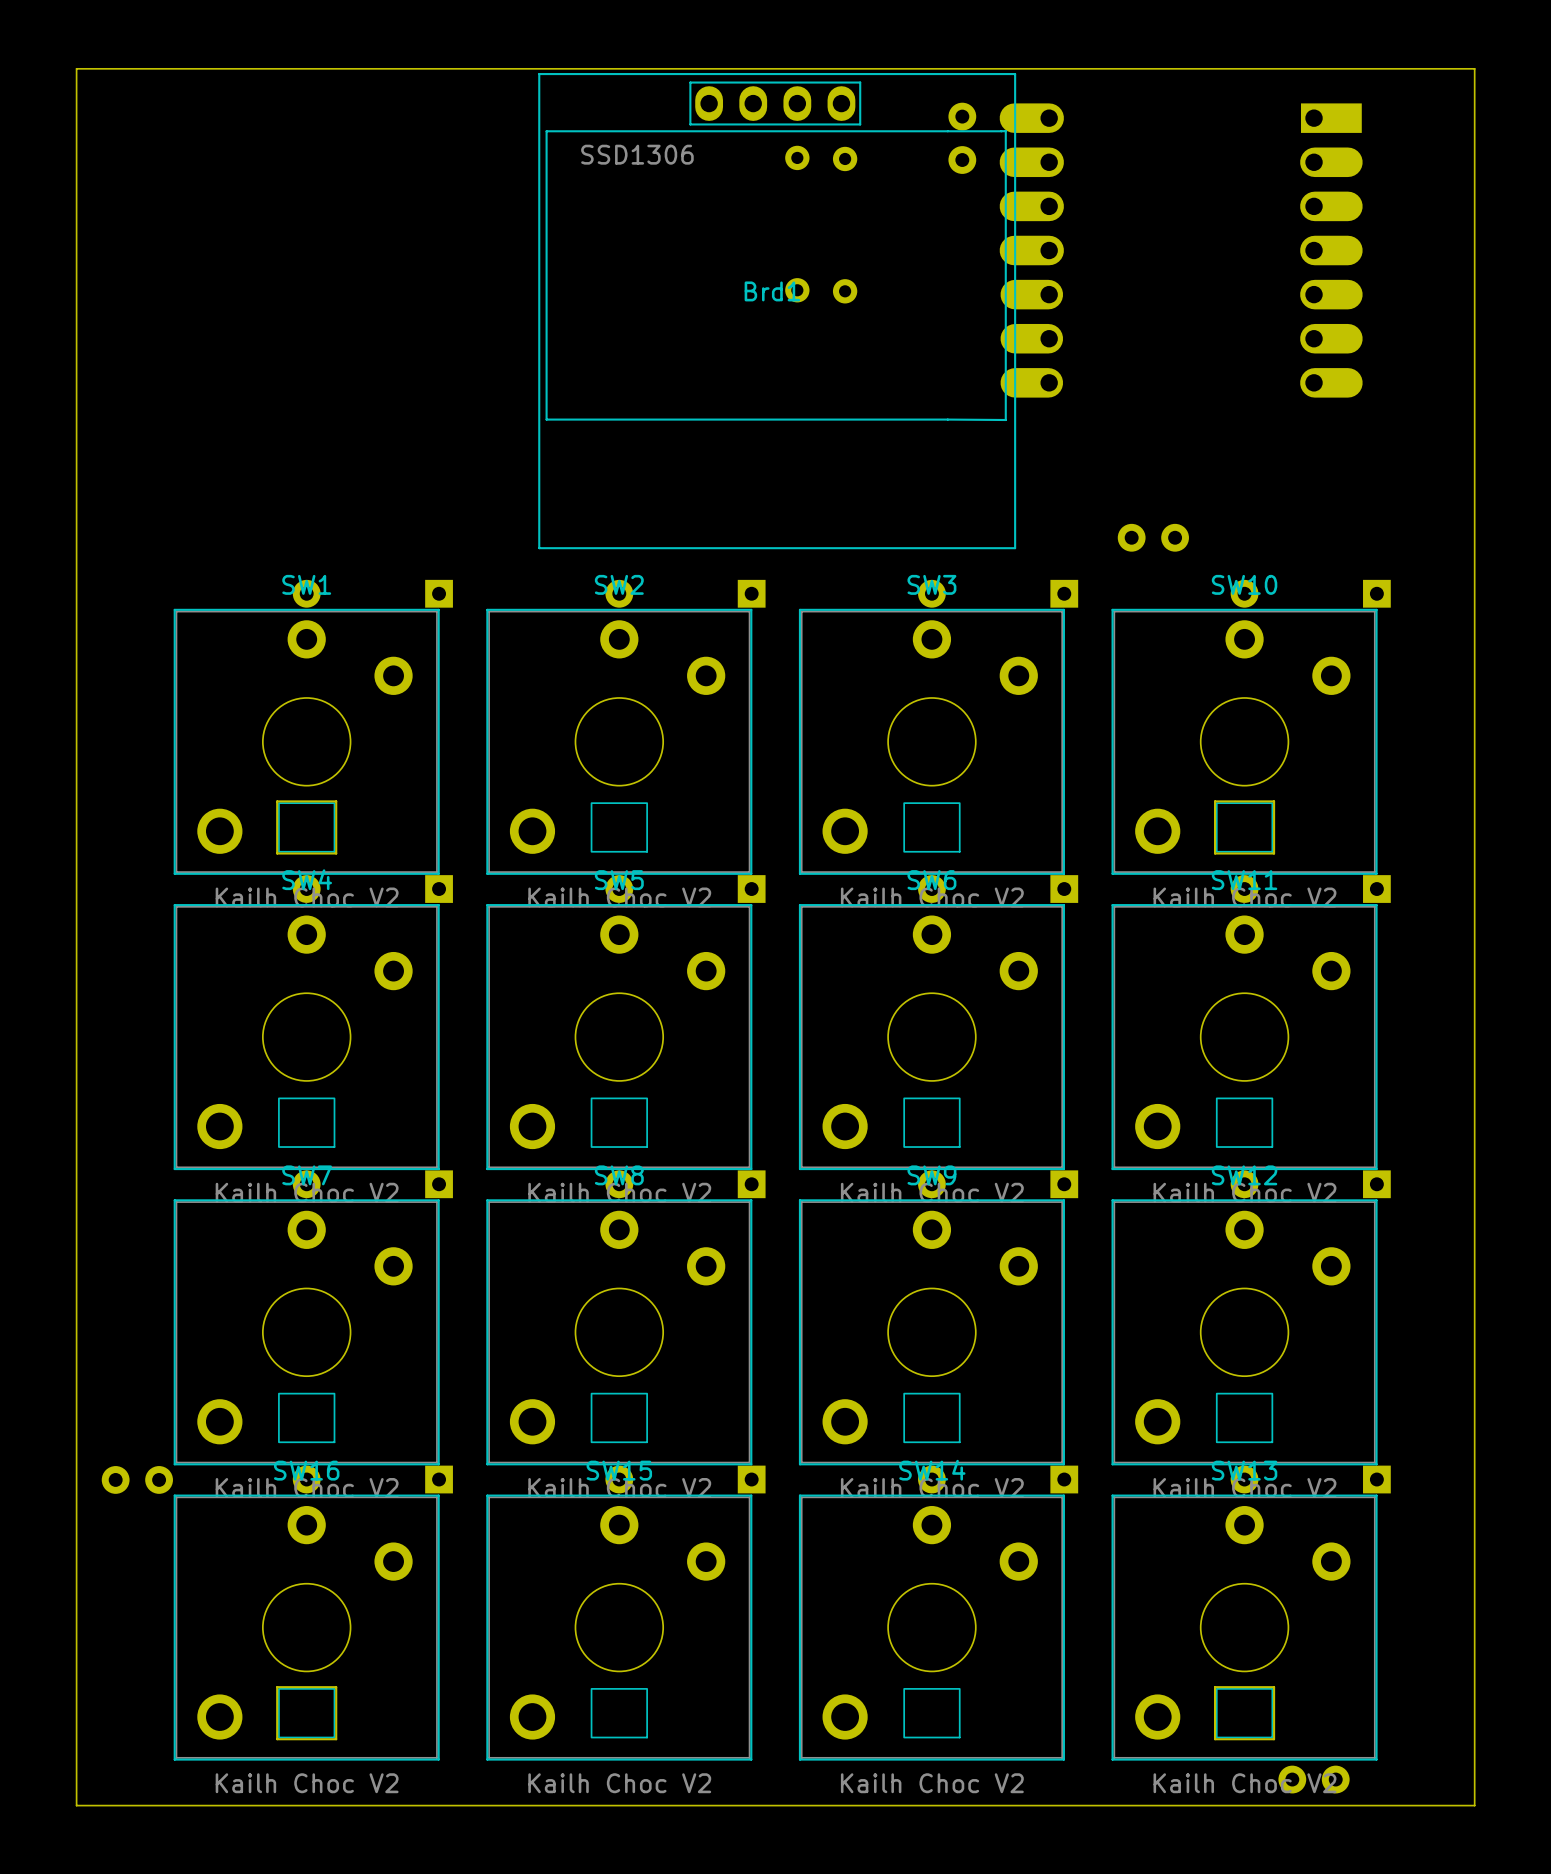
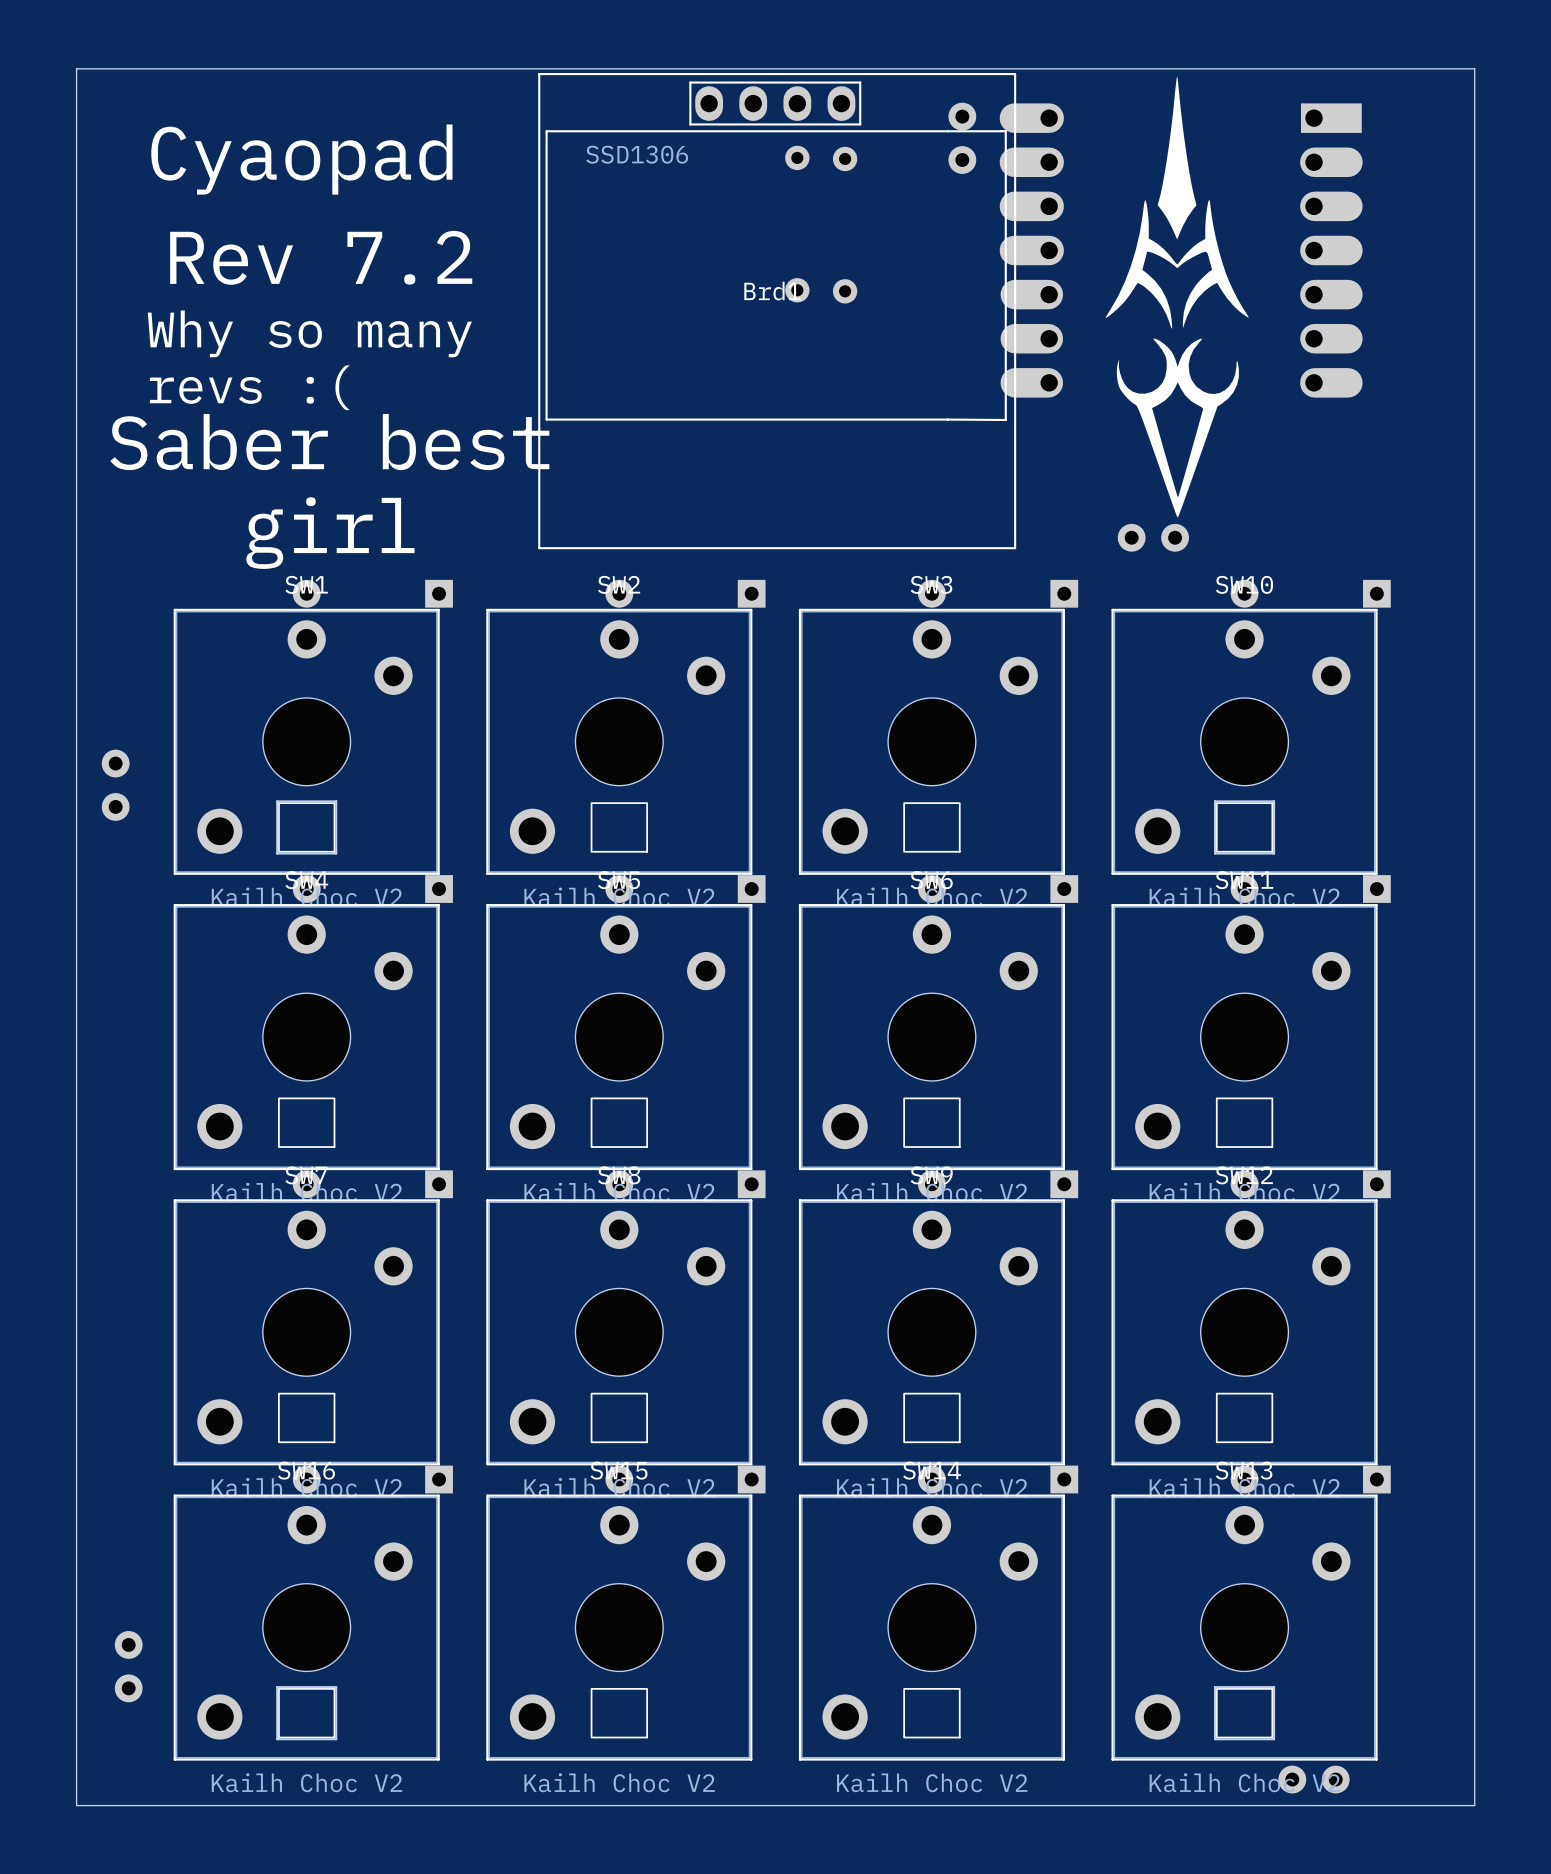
drawing: none -> [1105, 76, 1249, 518]
text: none -> Cyaopad (301, 159)
text: none -> Rev 7.2 (321, 257)
text: none -> Why so many (309, 333)
text: none -> revs :( (249, 387)
text: none -> Saber best (329, 442)
text: none -> girl (330, 533)
part: none -> (115, 785)
part rotation: 0° (137, 1479) -> 90° clockwise (128, 1666)
part position: (137, 1479) -> (128, 1666)

